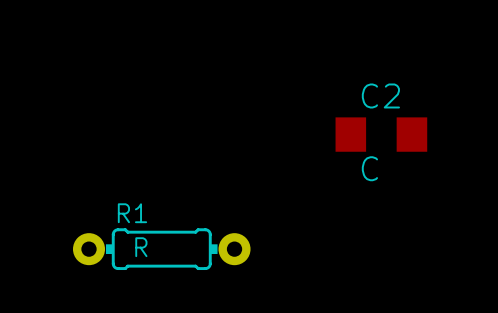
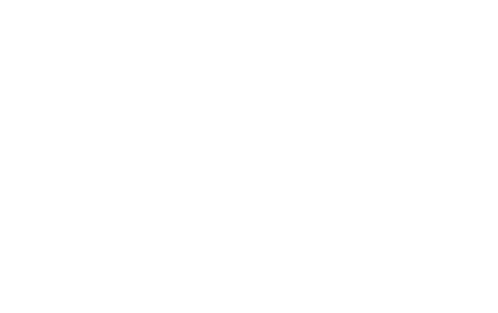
C2: C (381, 134) -> none
R1: R (161, 249) -> none

